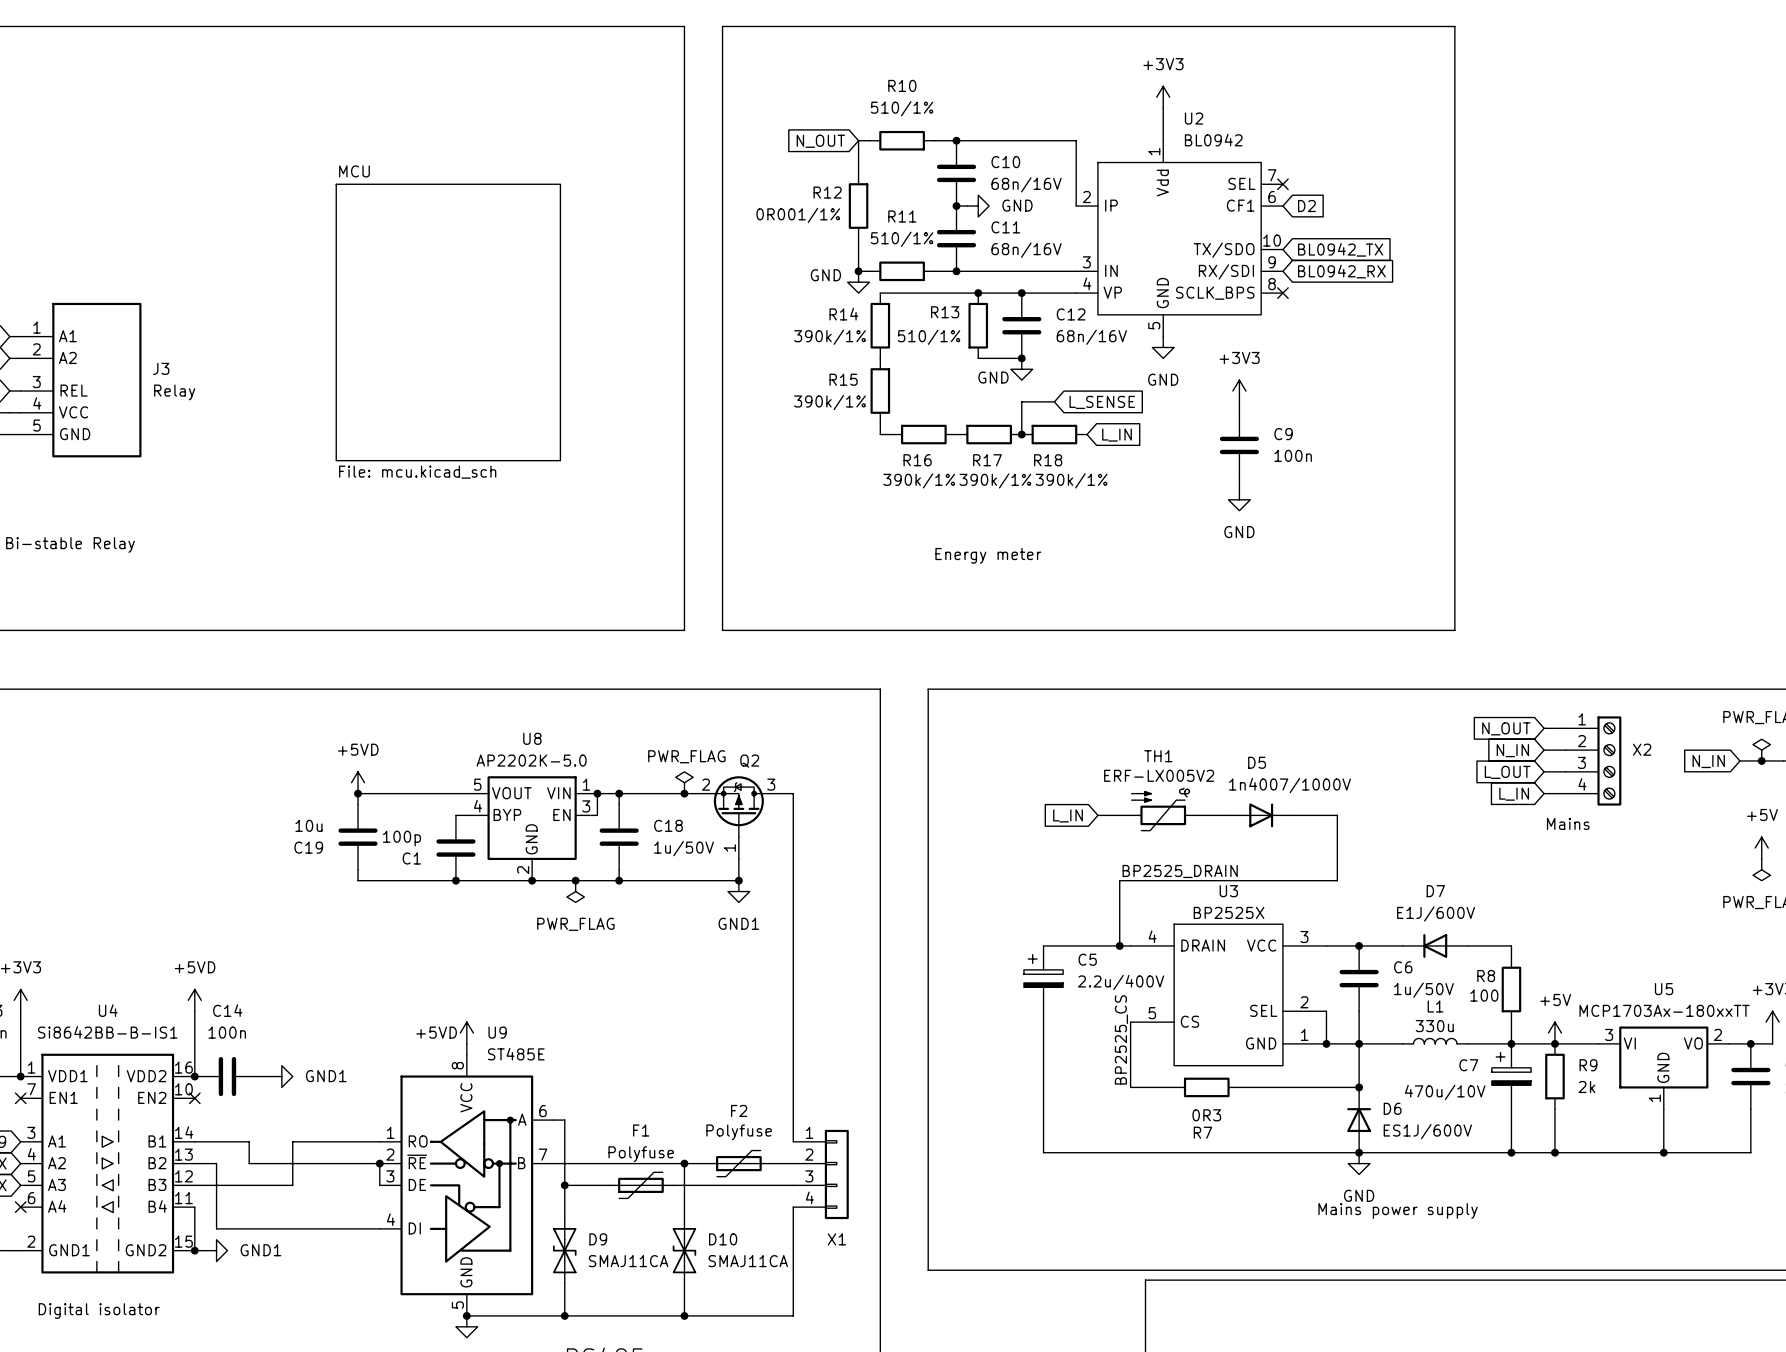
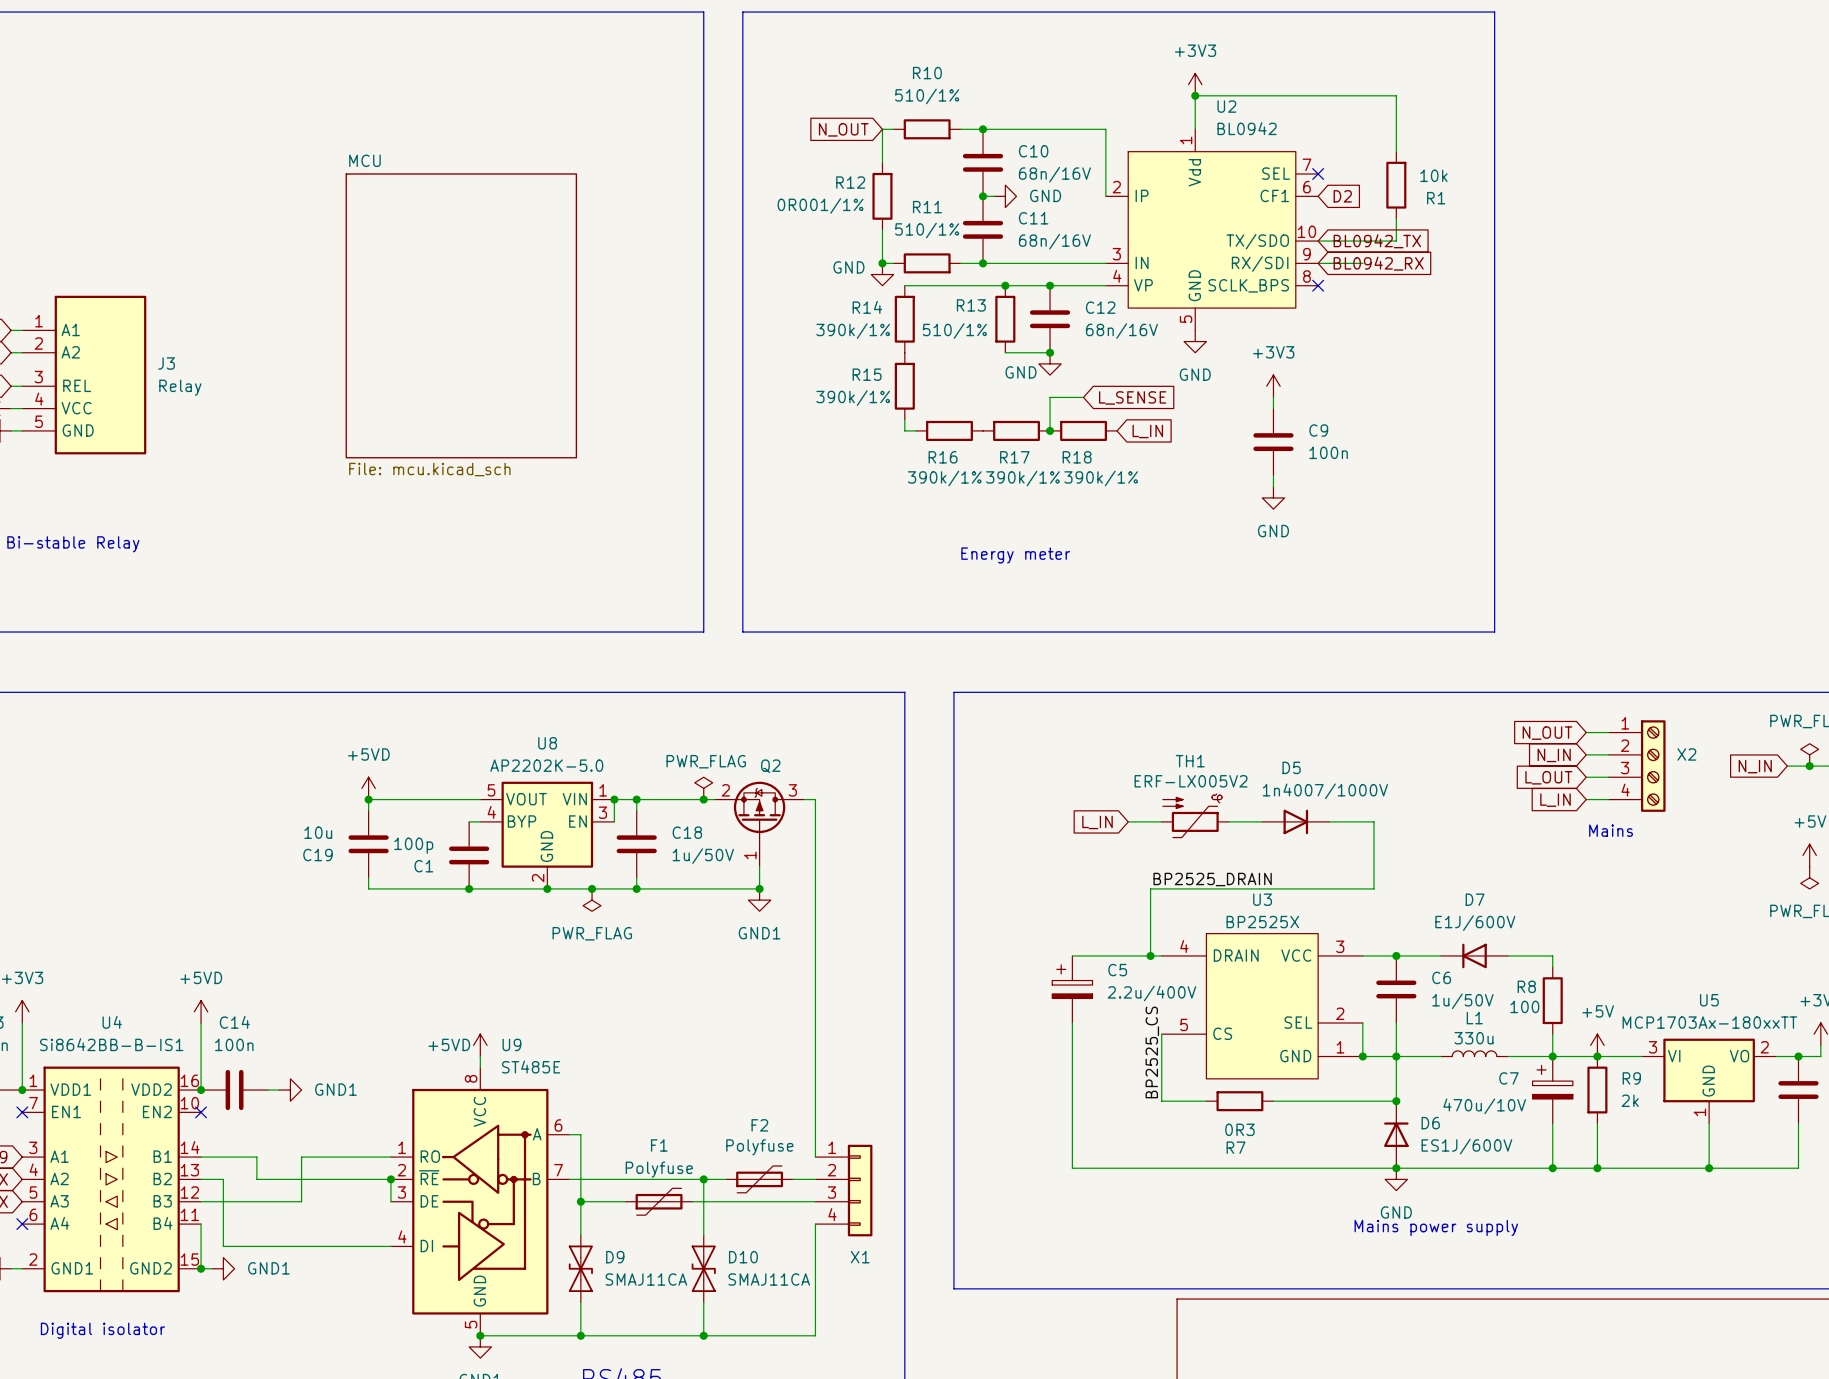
wire: none -> (1195, 95) (1396, 95) (1396, 151)
junction: none -> (1195, 95)
R1: none -> 10k (1396, 185)
wire: none -> (1396, 218) (1396, 241) (1318, 241)
wire: none -> (1318, 263) (1362, 263)

